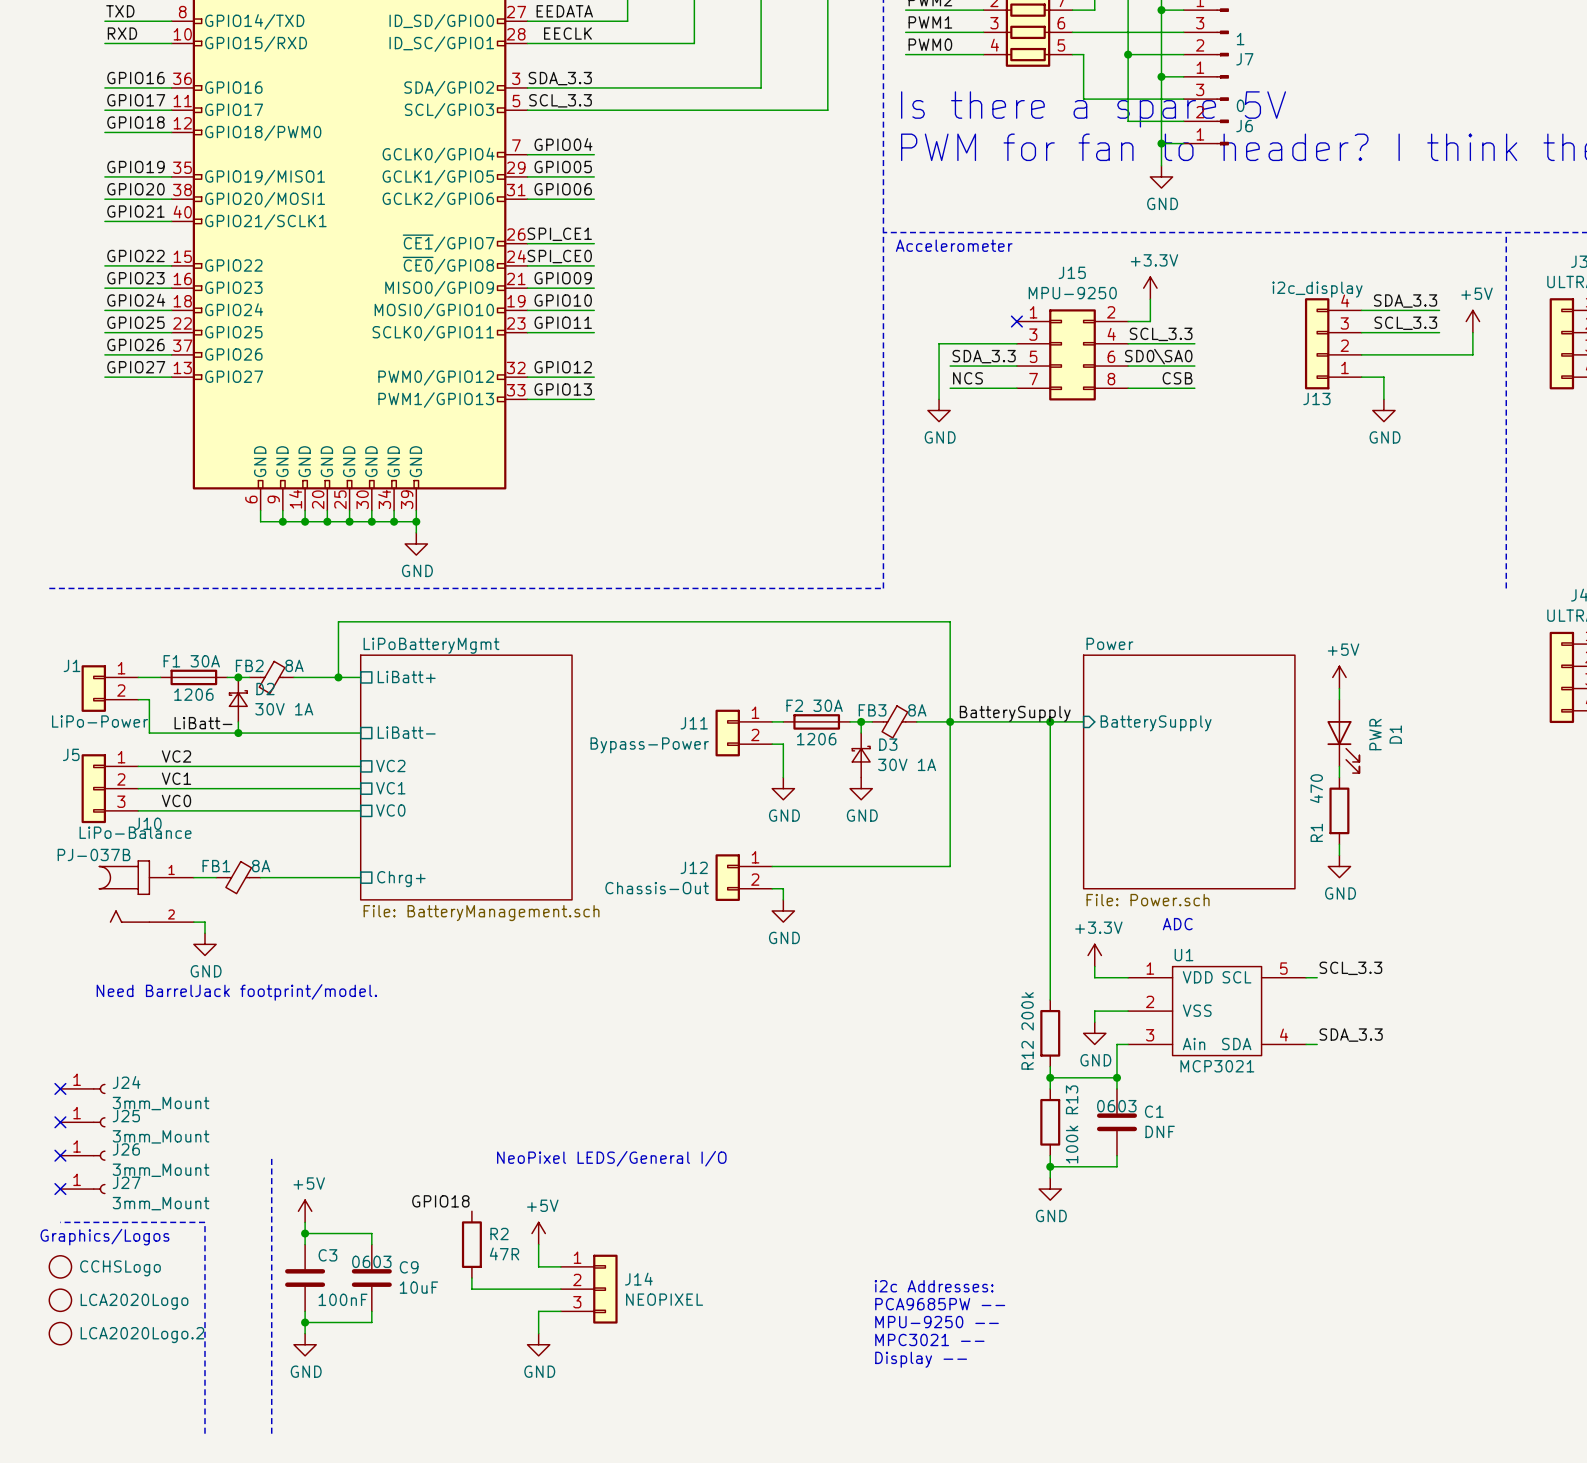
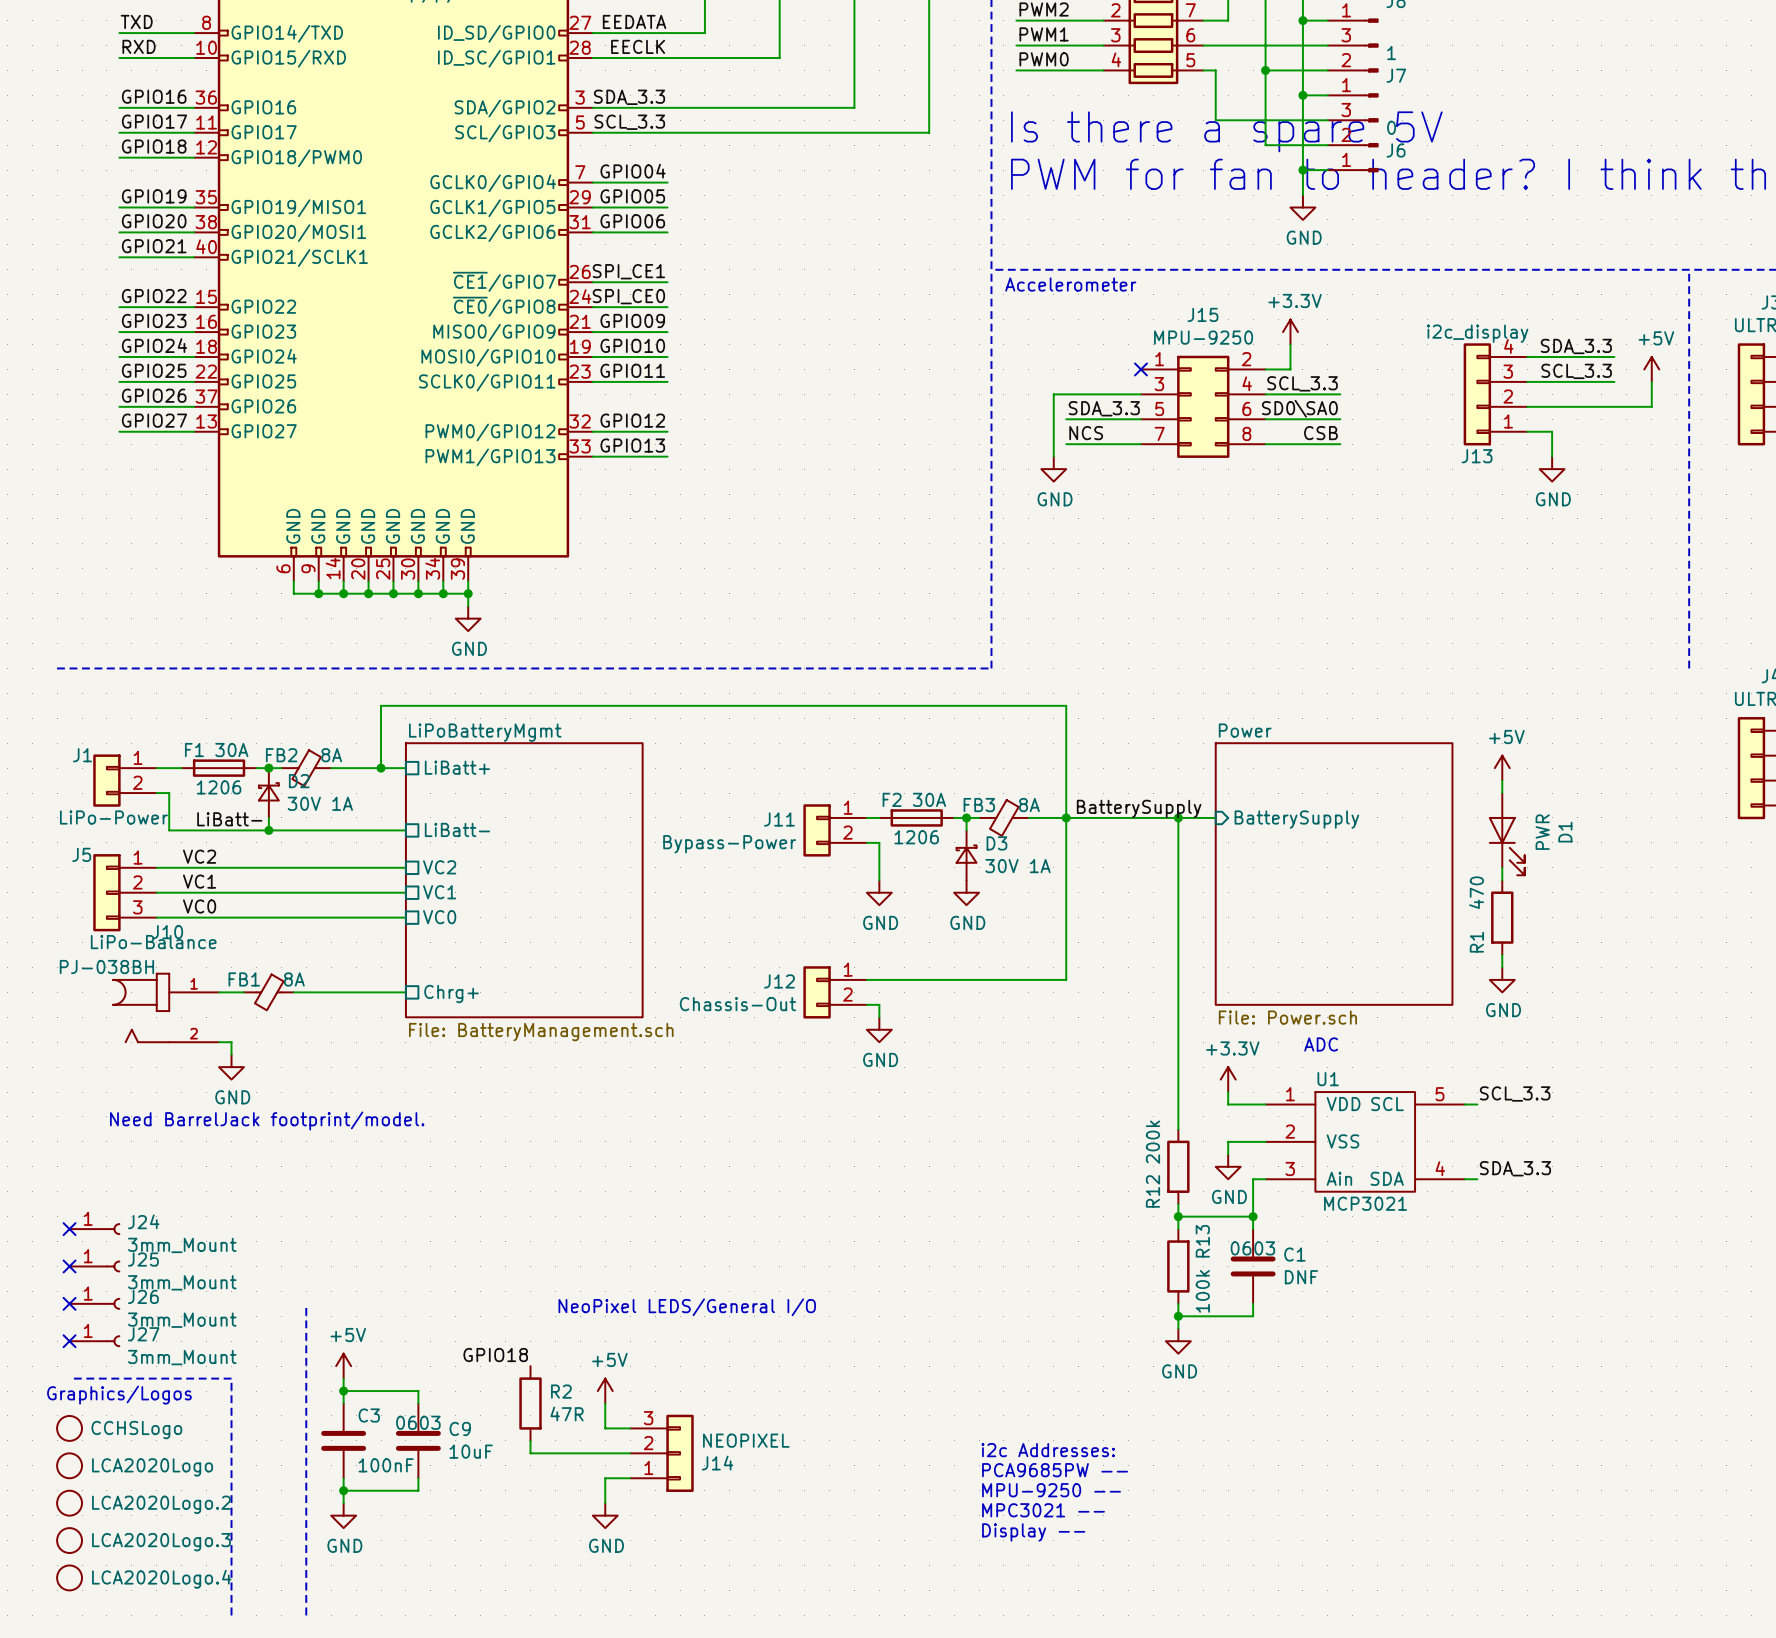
J10 value: PJ-037B (94, 854) -> PJ-038BH (106, 967)
J14 flip: as is (605, 1289) -> up-down (680, 1453)
part: none -> LCA2020Logo.3 (69, 1540)
part: none -> LCA2020Logo.4 (69, 1577)

